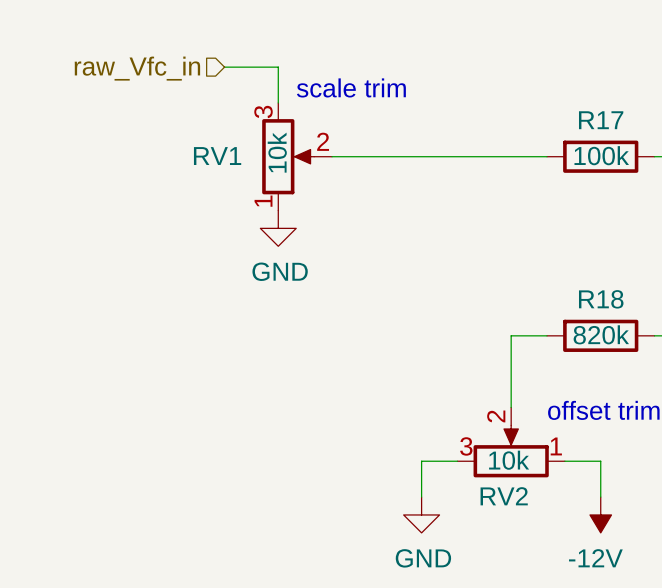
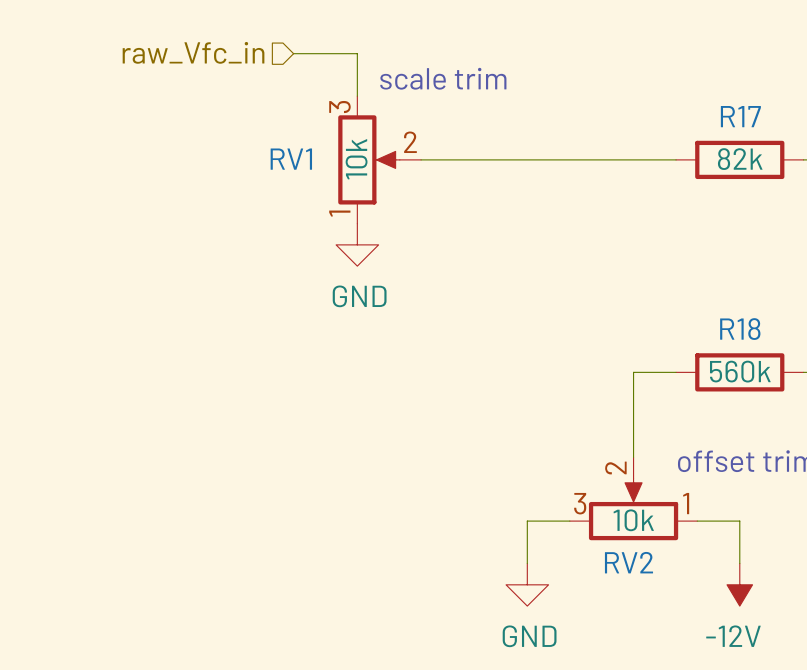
R17 value: 100k (601, 155) -> 82k (740, 159)
R18 value: 820k (601, 334) -> 560k (740, 371)

